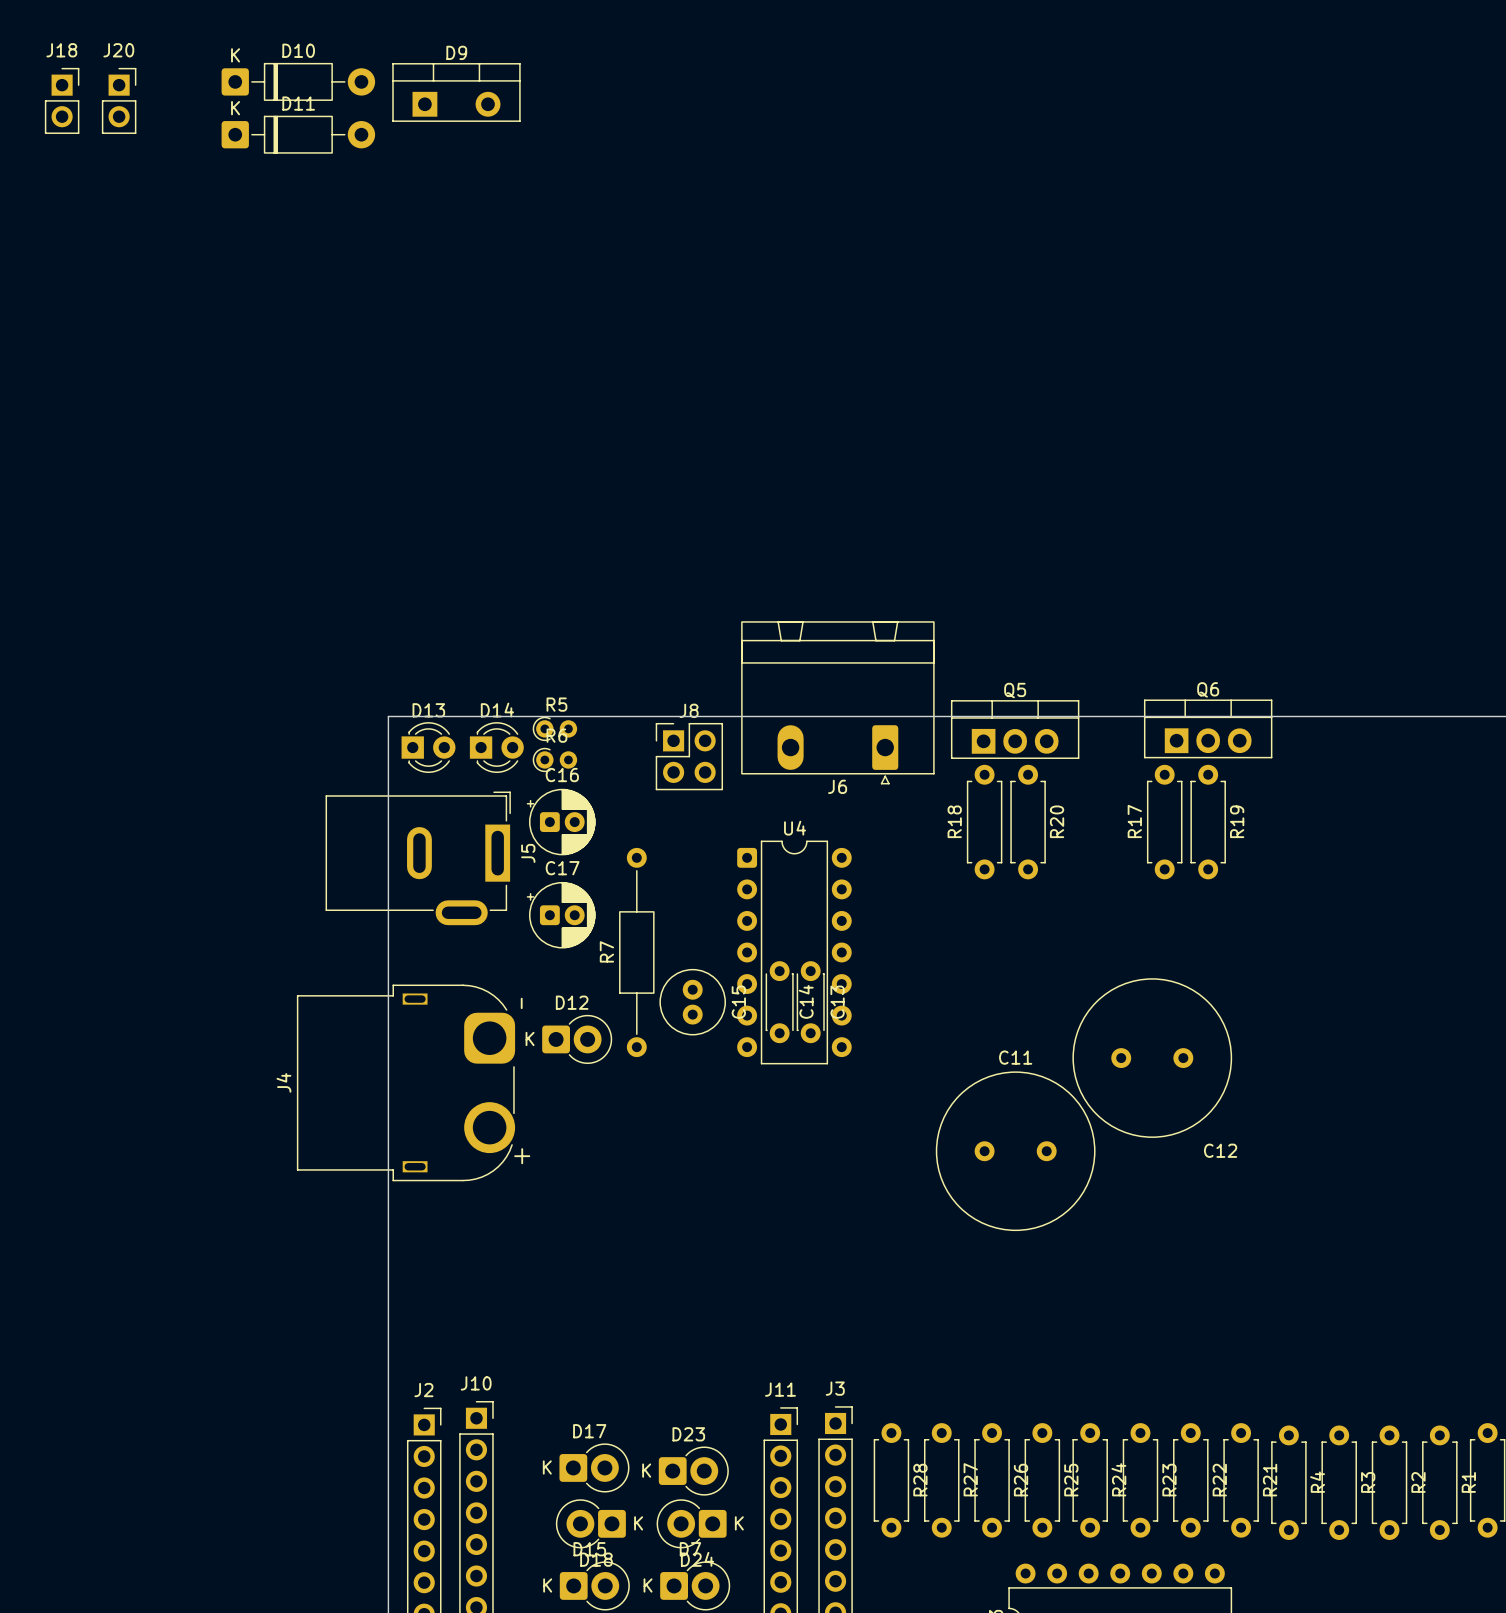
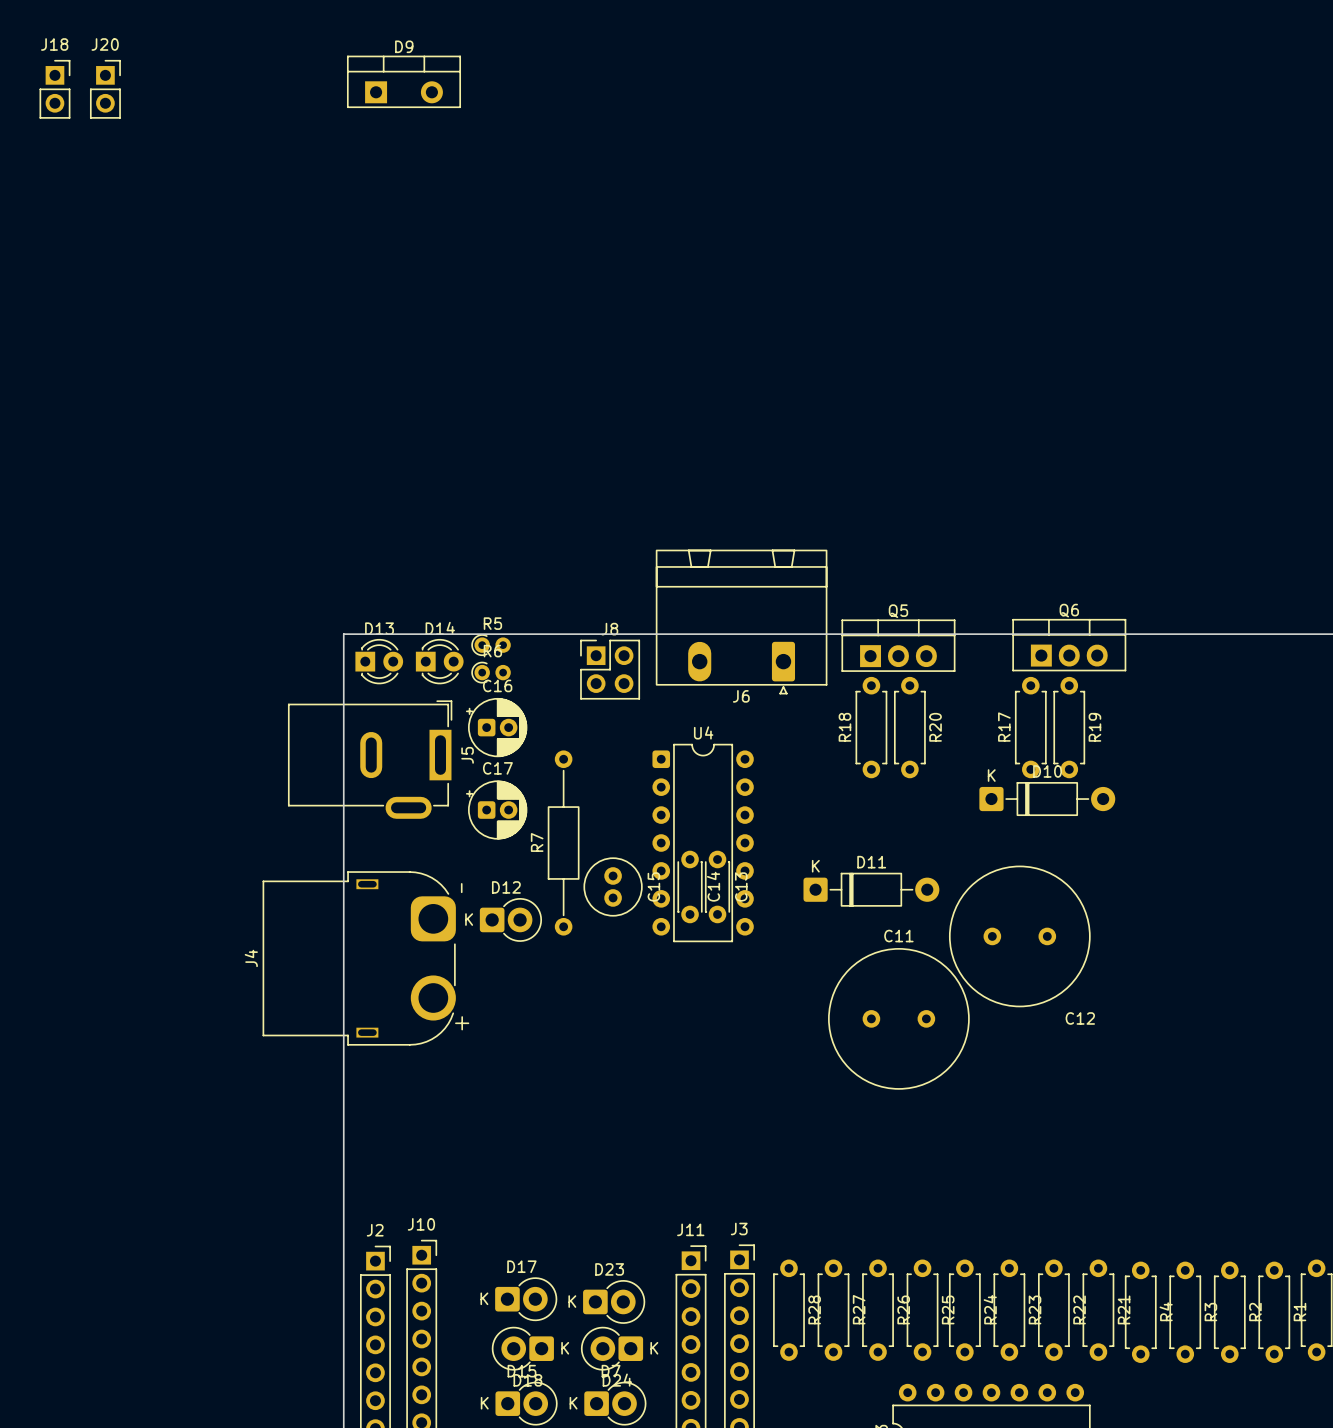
D10 position: (298, 81) -> (1047, 799)
D11 position: (298, 134) -> (871, 889)

